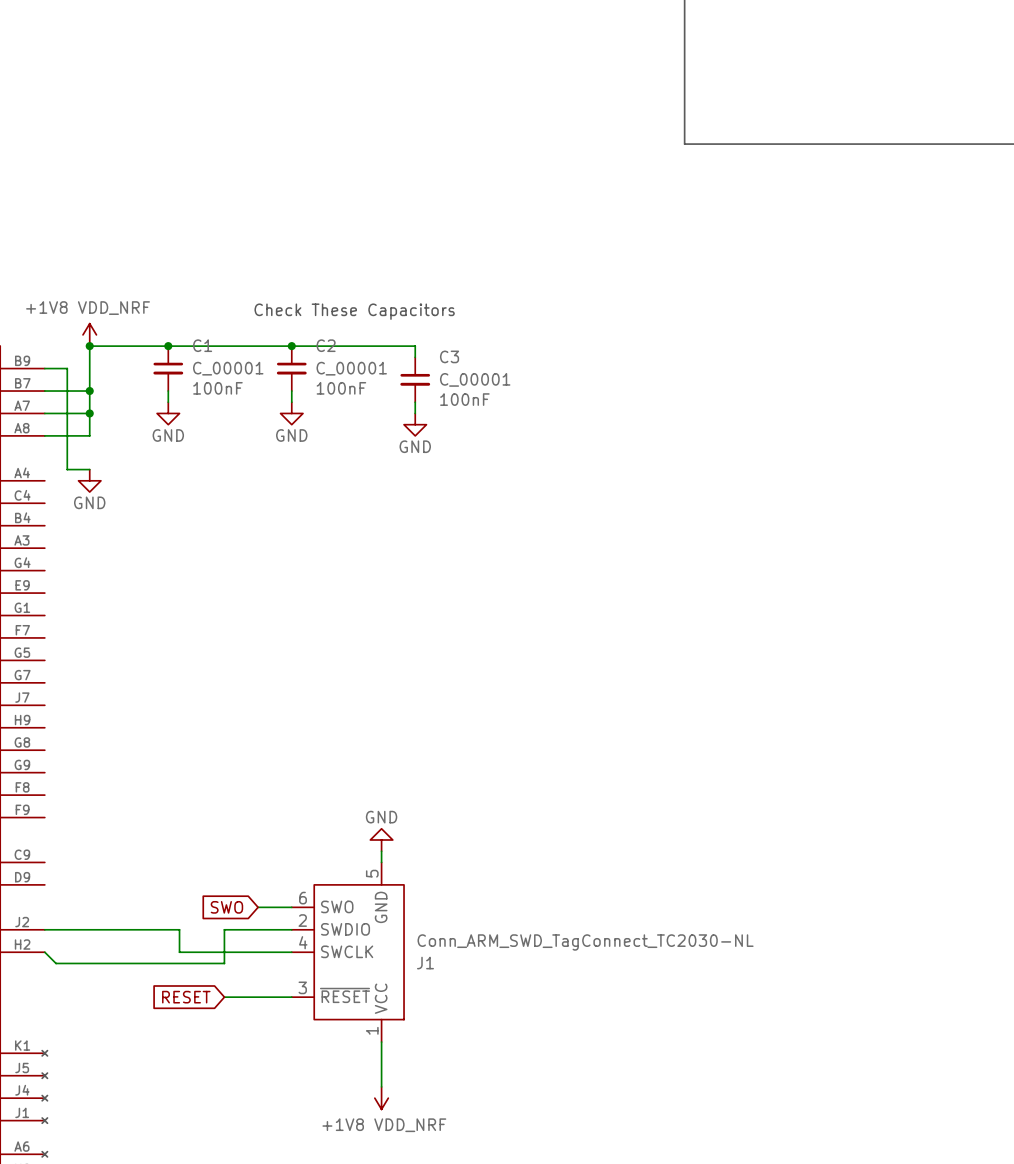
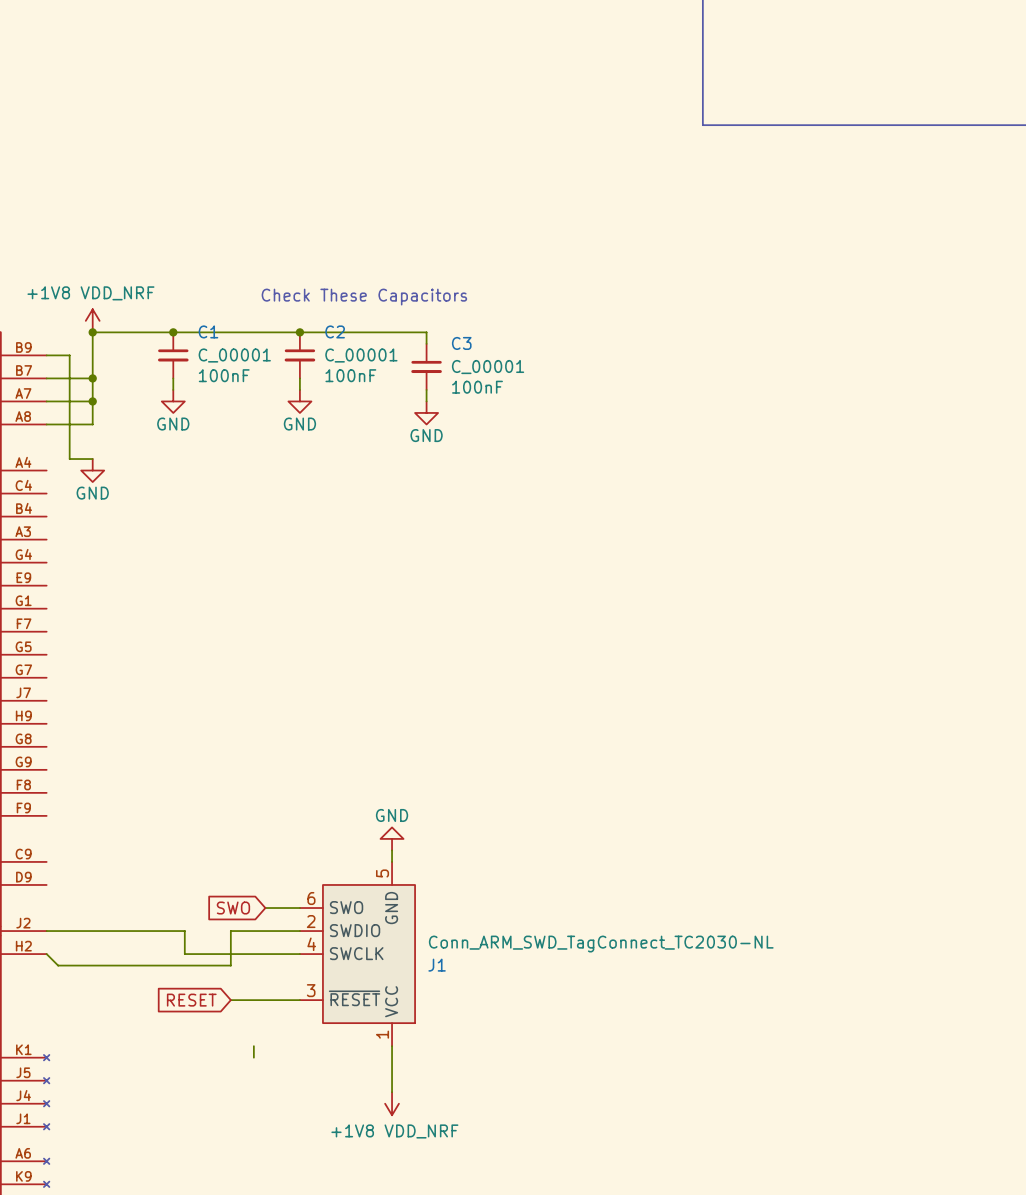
wire: none -> (253, 1046) (253, 1057)

